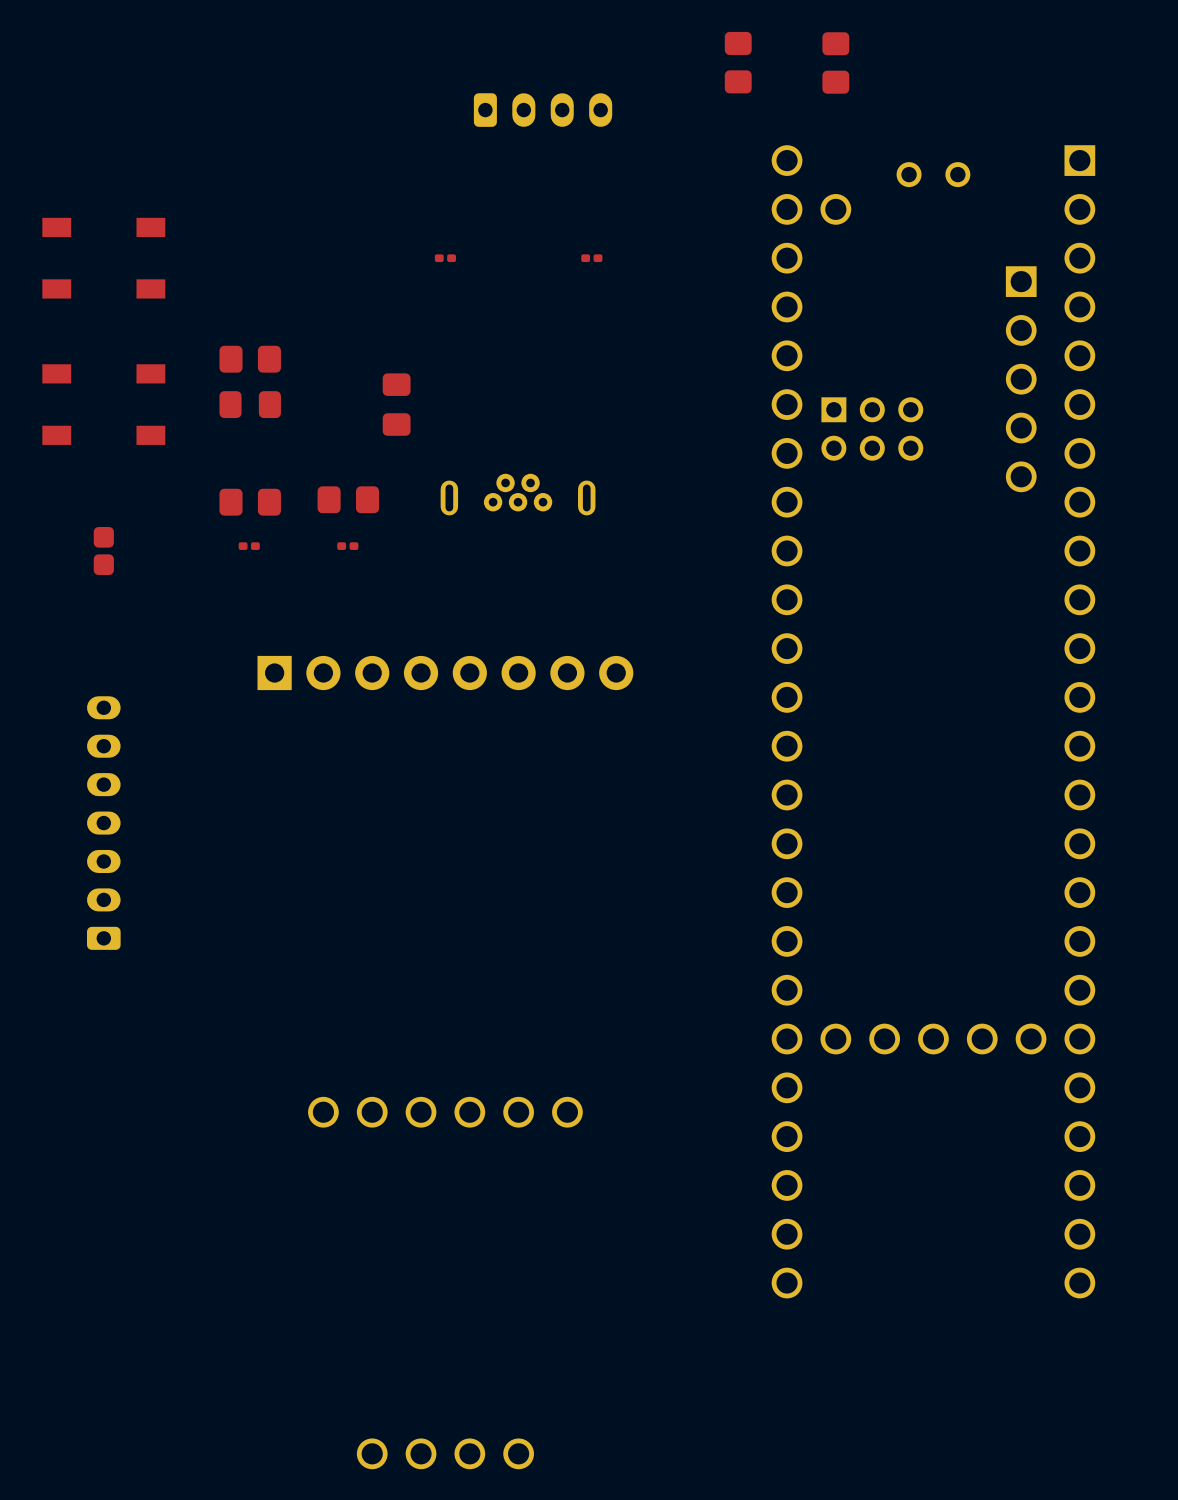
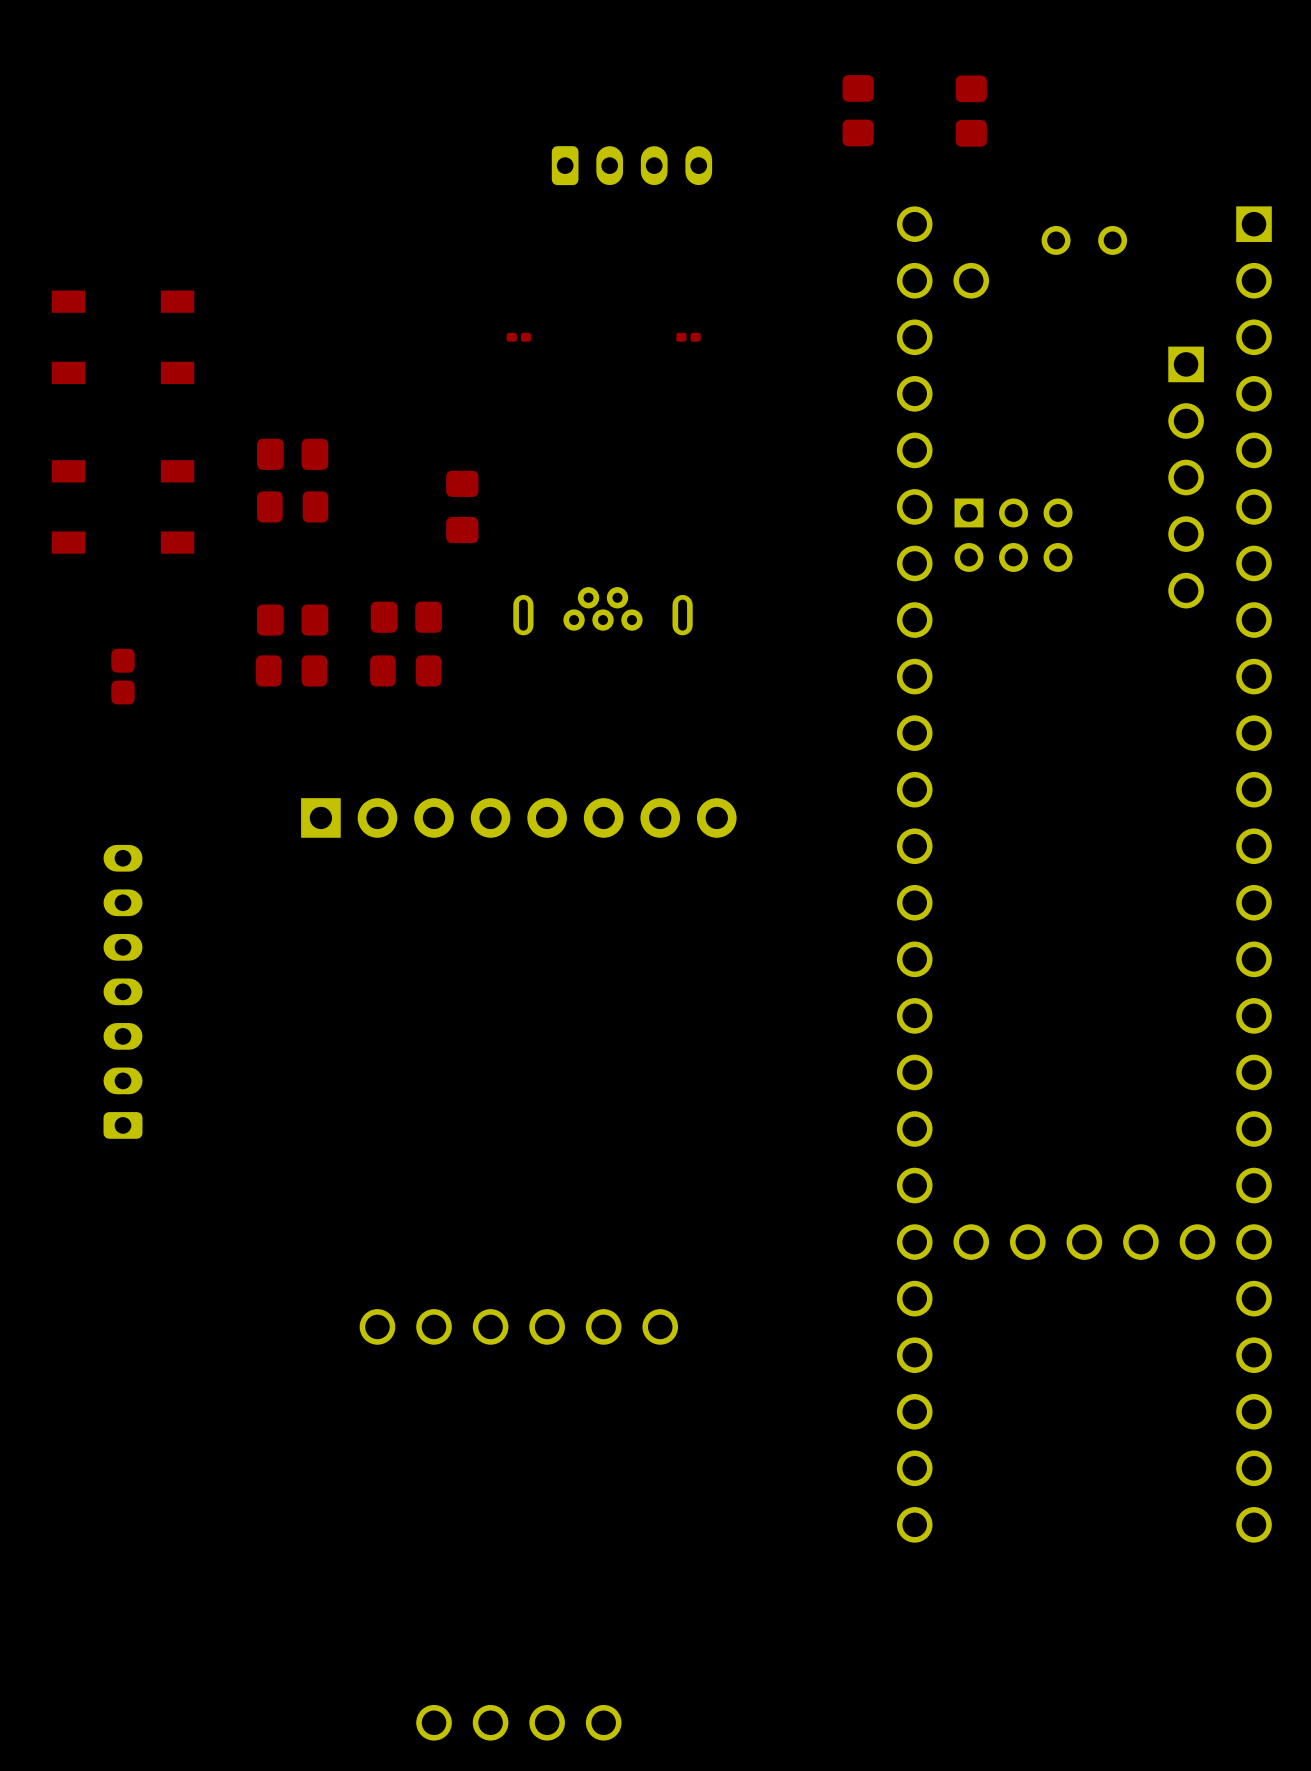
part footprint: [238, 542, 260, 550] -> [255, 655, 328, 687]
part footprint: [337, 542, 359, 550] -> [370, 655, 442, 687]

